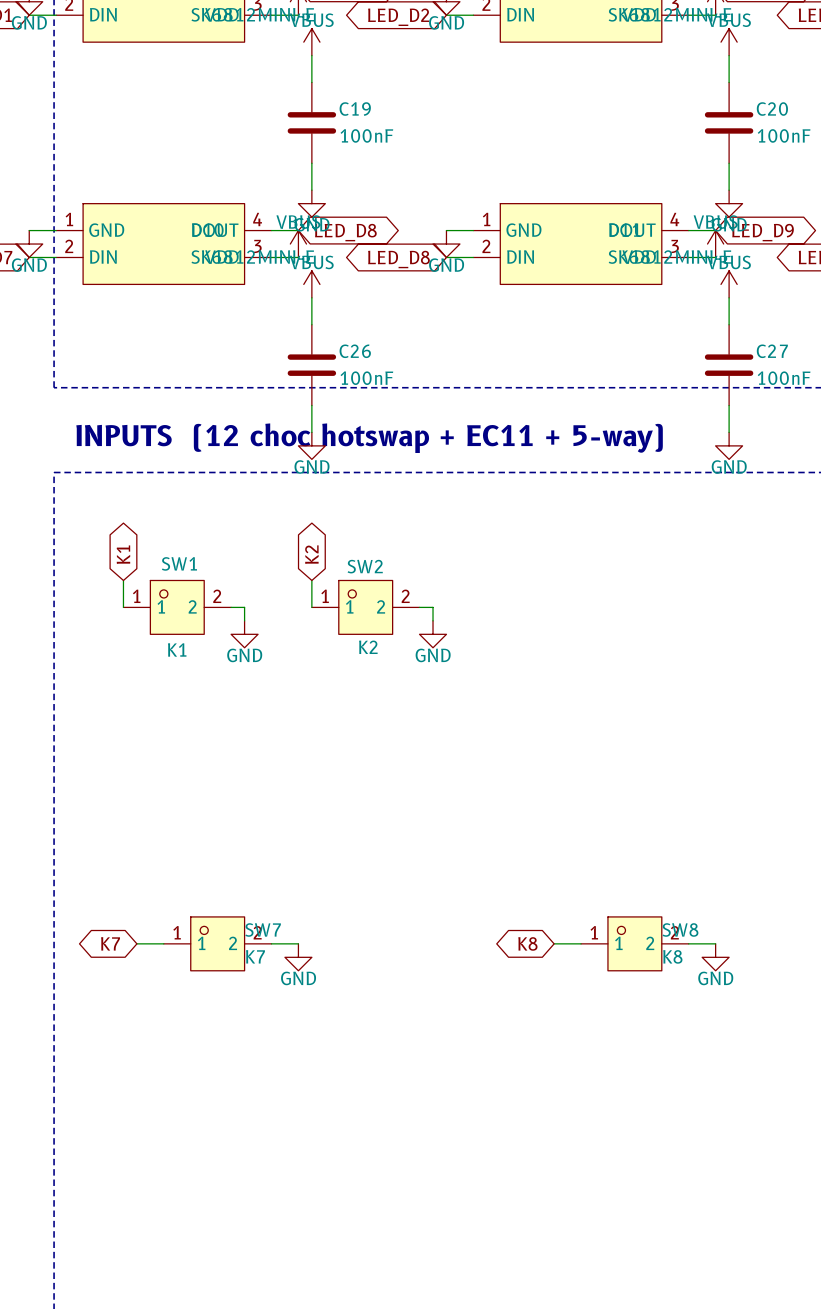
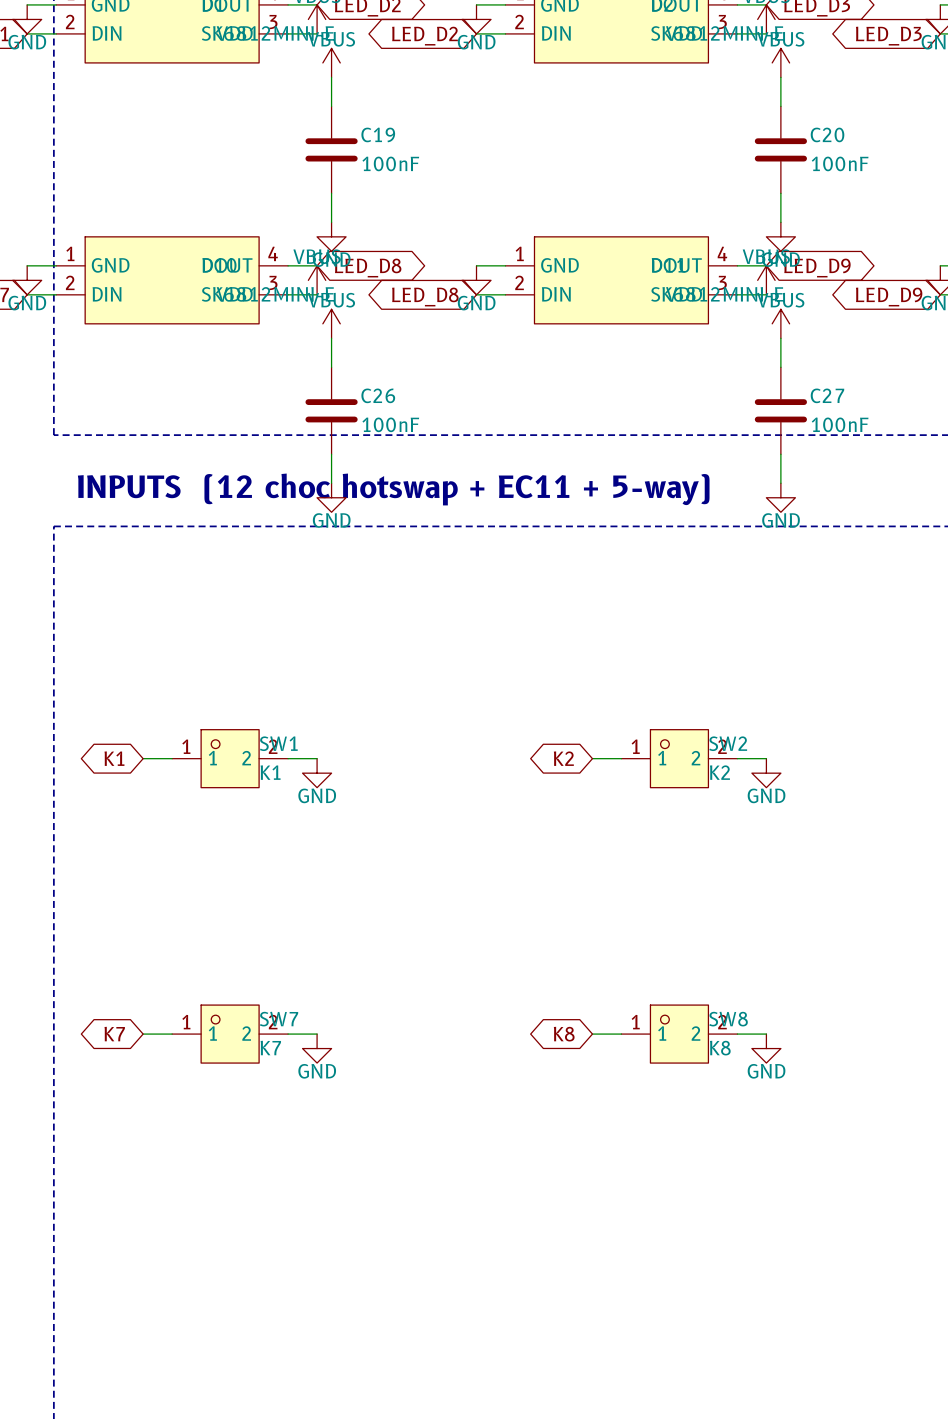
global label rotation: 0° (123, 554) -> 90° counterclockwise (114, 758)
global label position: K1 (123, 554) -> K1 (114, 758)
global label: K2 (311, 554) -> none
SW1 name position: SW1 (179, 563) -> SW1 (278, 743)
SW2 name position: SW2 (365, 566) -> SW2 (728, 743)
wire: (123, 580) (123, 607) -> none
wire: (311, 580) (311, 607) -> none
SW1 position: (177, 607) -> (230, 758)
wire: (231, 607) (244, 607) (244, 620) -> none
SW2 position: (365, 607) -> (679, 758)
wire: (419, 607) (433, 607) (433, 620) -> none
power symbol: GND (244, 634) -> none
power symbol: GND (433, 634) -> none
SW2 value position: K2 (368, 647) -> K2 (719, 772)
SW1 value position: K1 (177, 649) -> K1 (270, 772)
wire: none -> (143, 758) (172, 758)
wire: none -> (288, 758) (317, 758)
global label: none -> K2 (563, 758)
wire: none -> (592, 758) (621, 758)
wire: none -> (737, 758) (766, 758)
power symbol: none -> GND (317, 773)
power symbol: none -> GND (766, 773)

